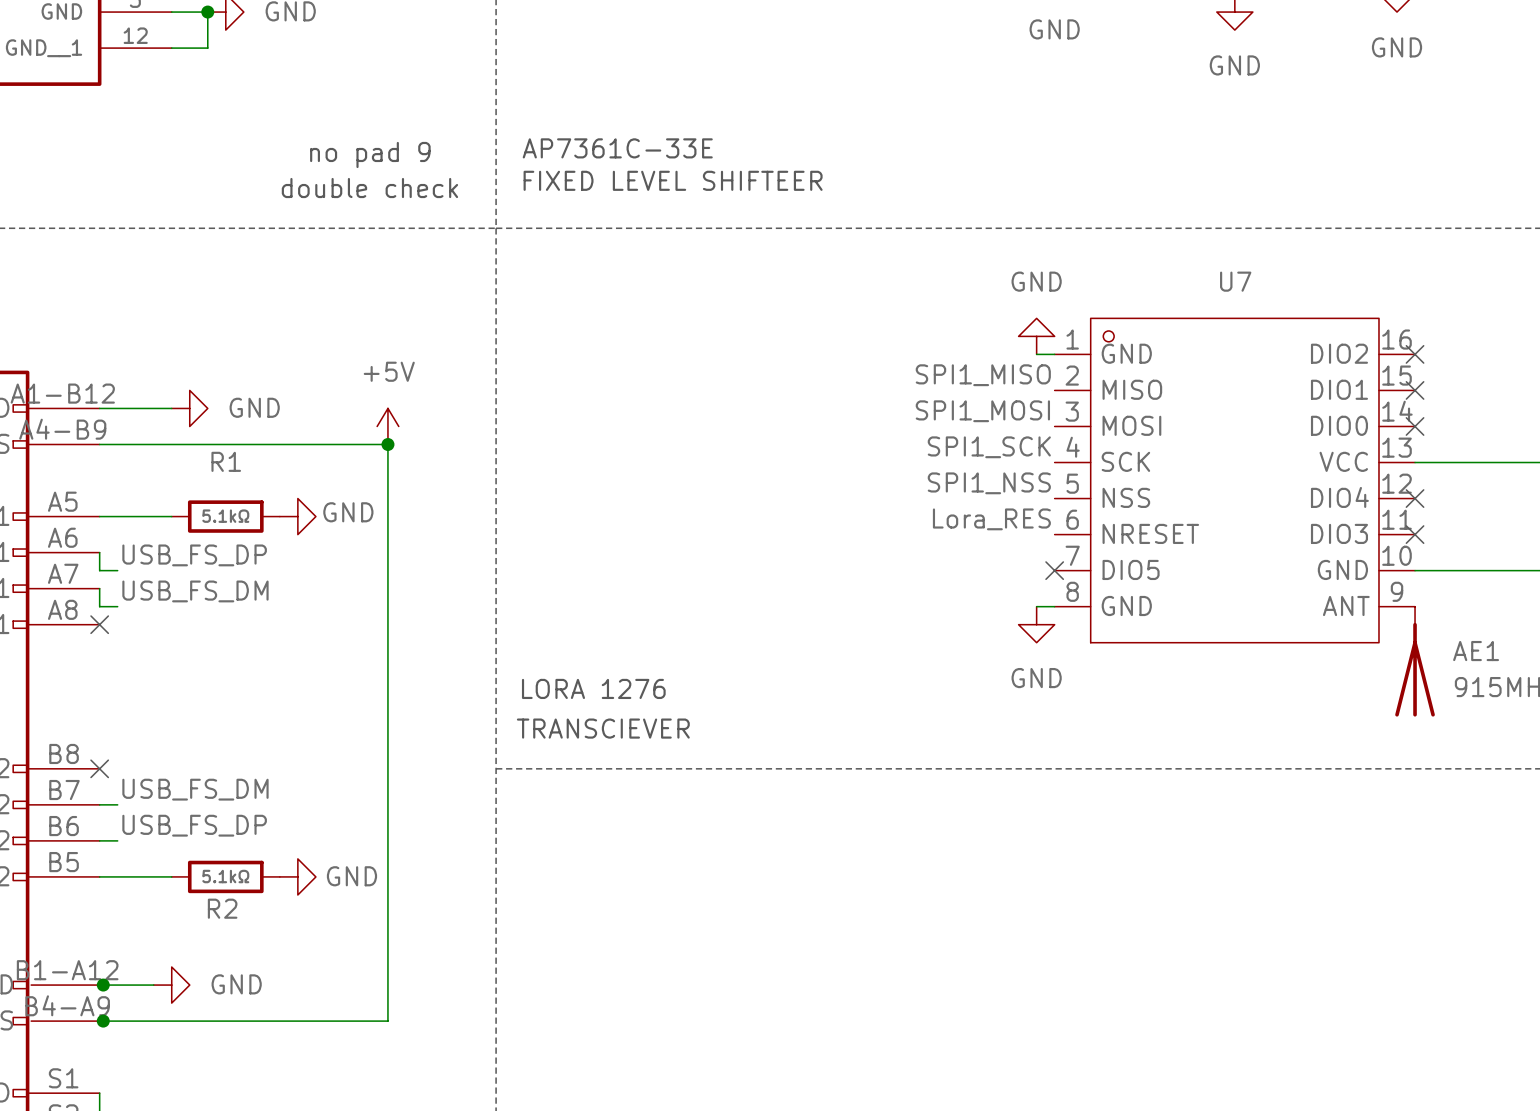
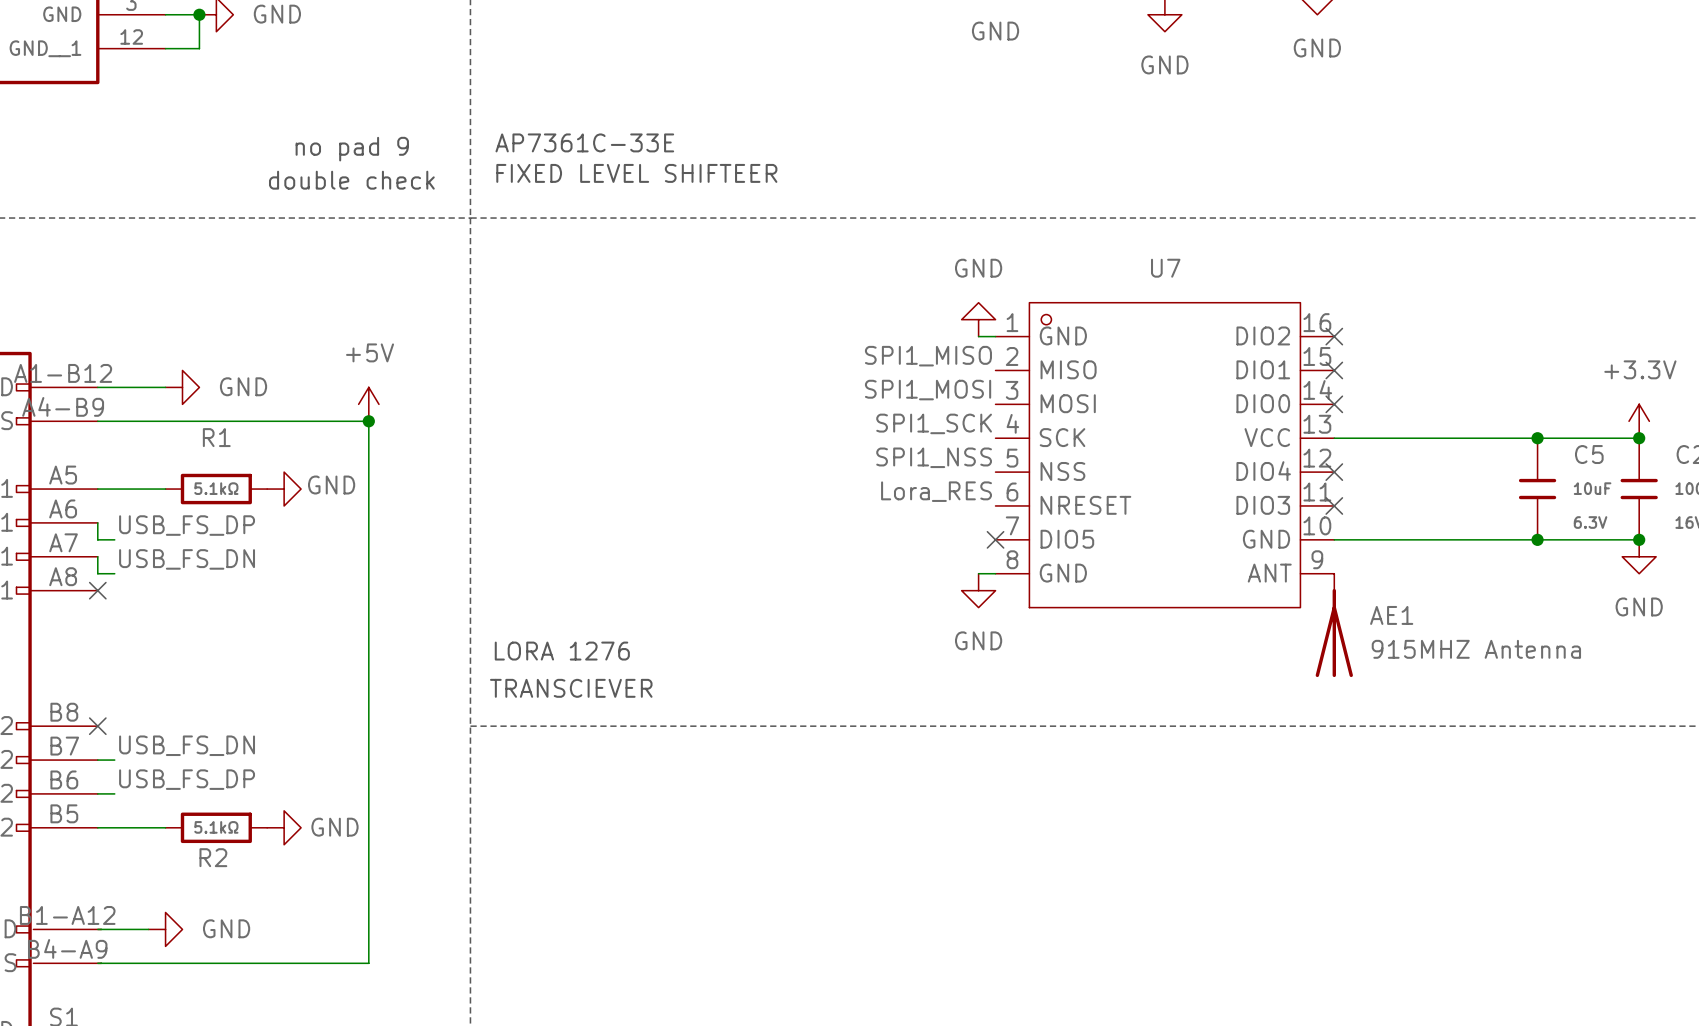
label: USB_FS_DM (195, 591) -> USB_FS_DN (187, 559)
label: USB_FS_DM (195, 789) -> USB_FS_DN (187, 745)
junction: (103, 985) -> none
junction: (103, 1021) -> none

